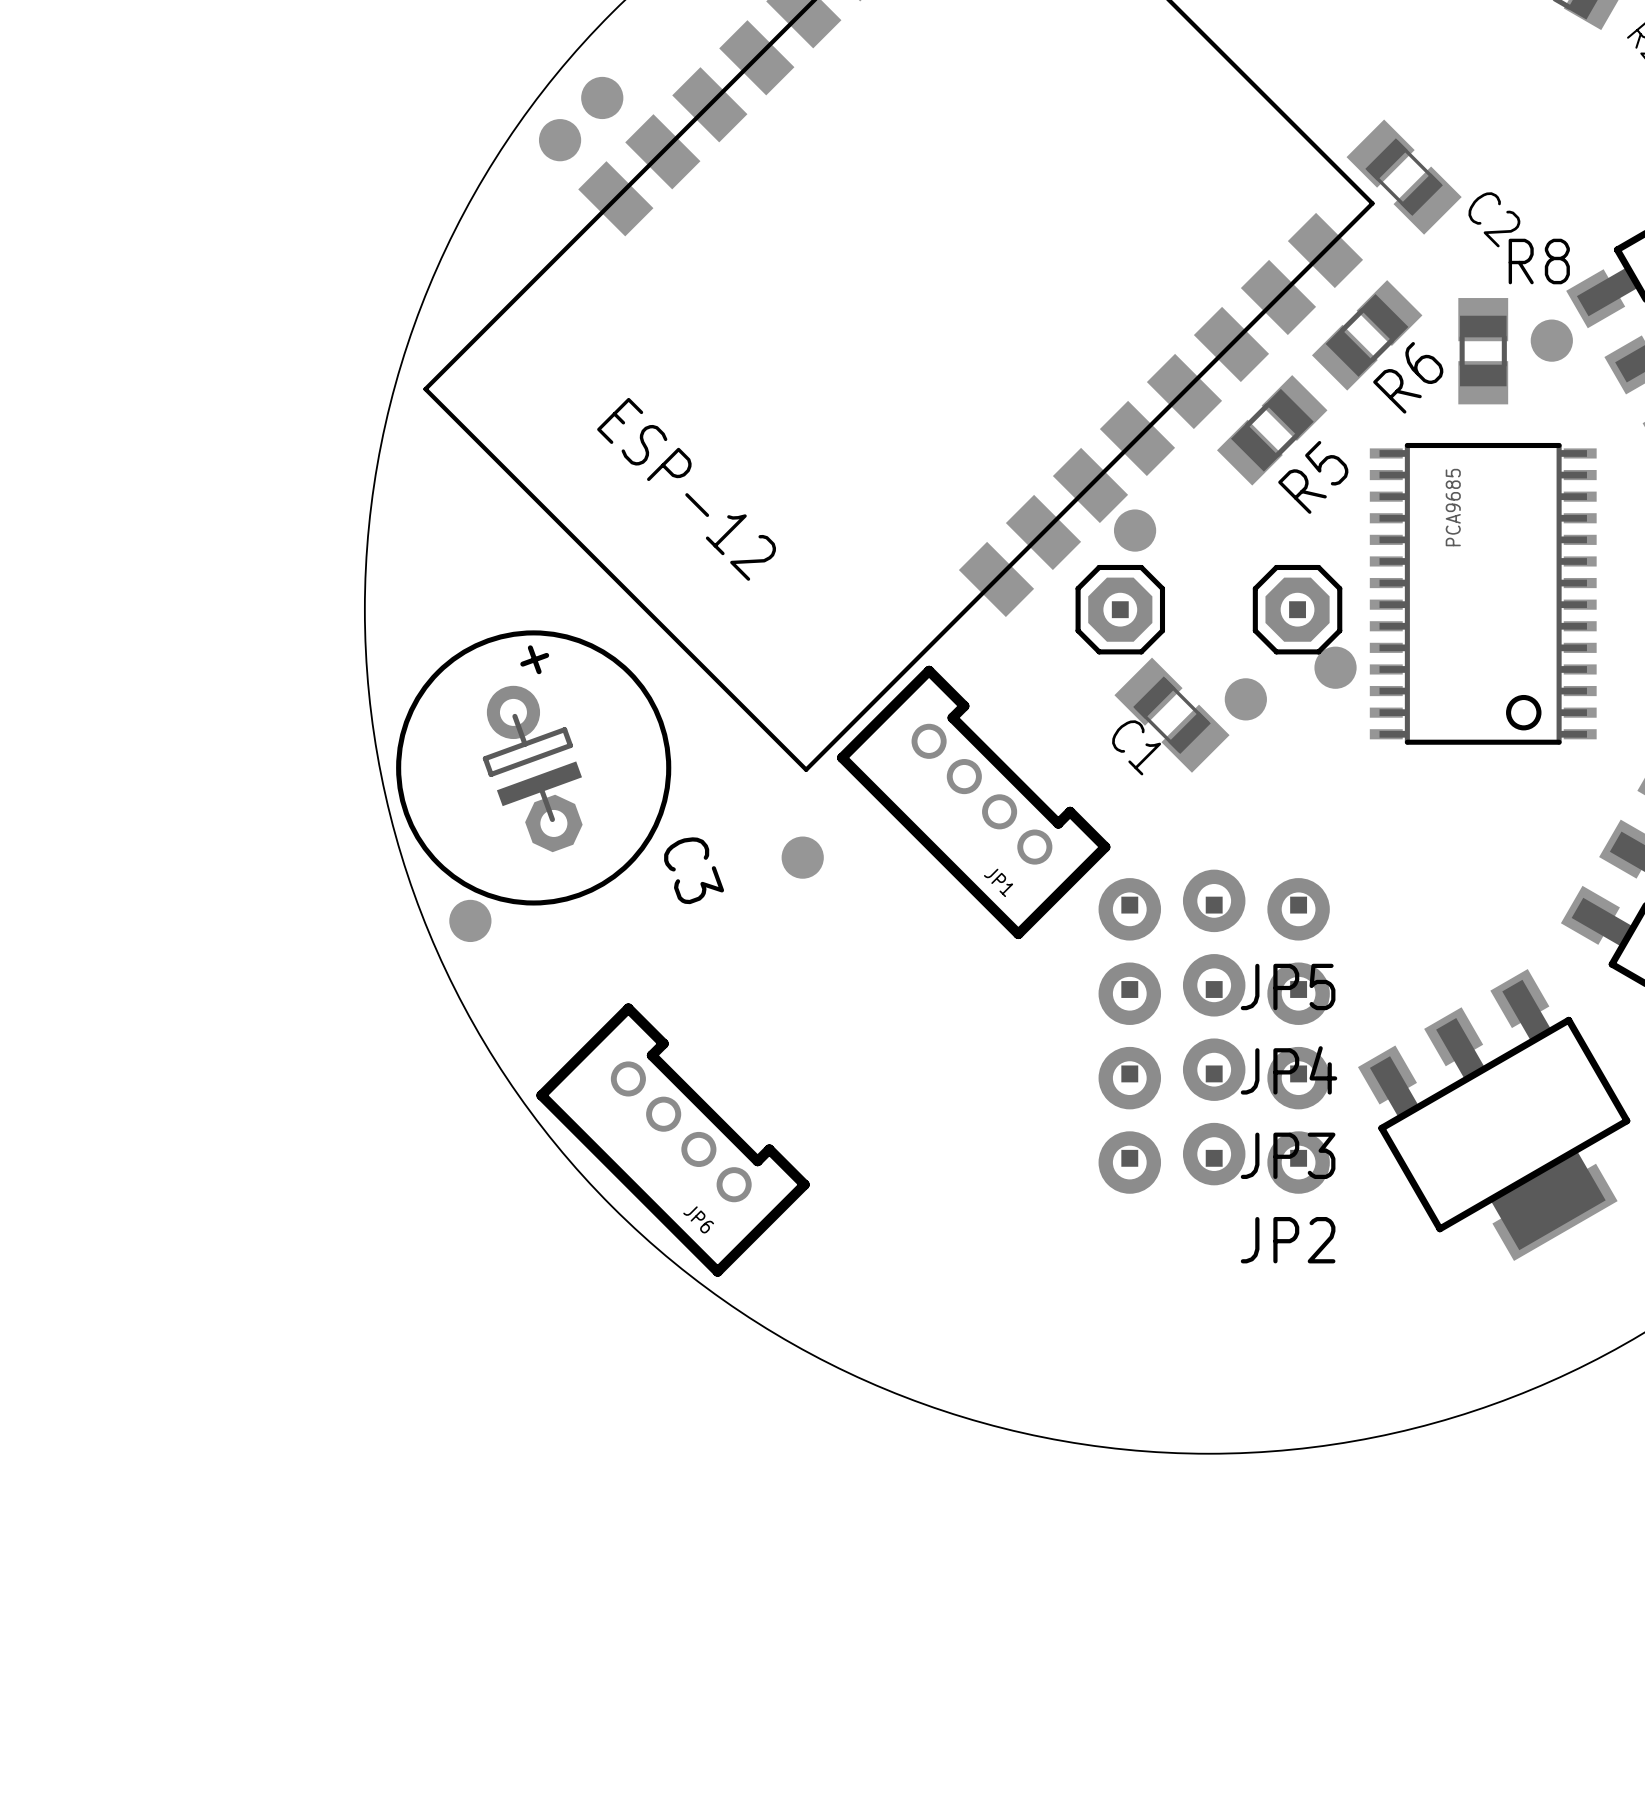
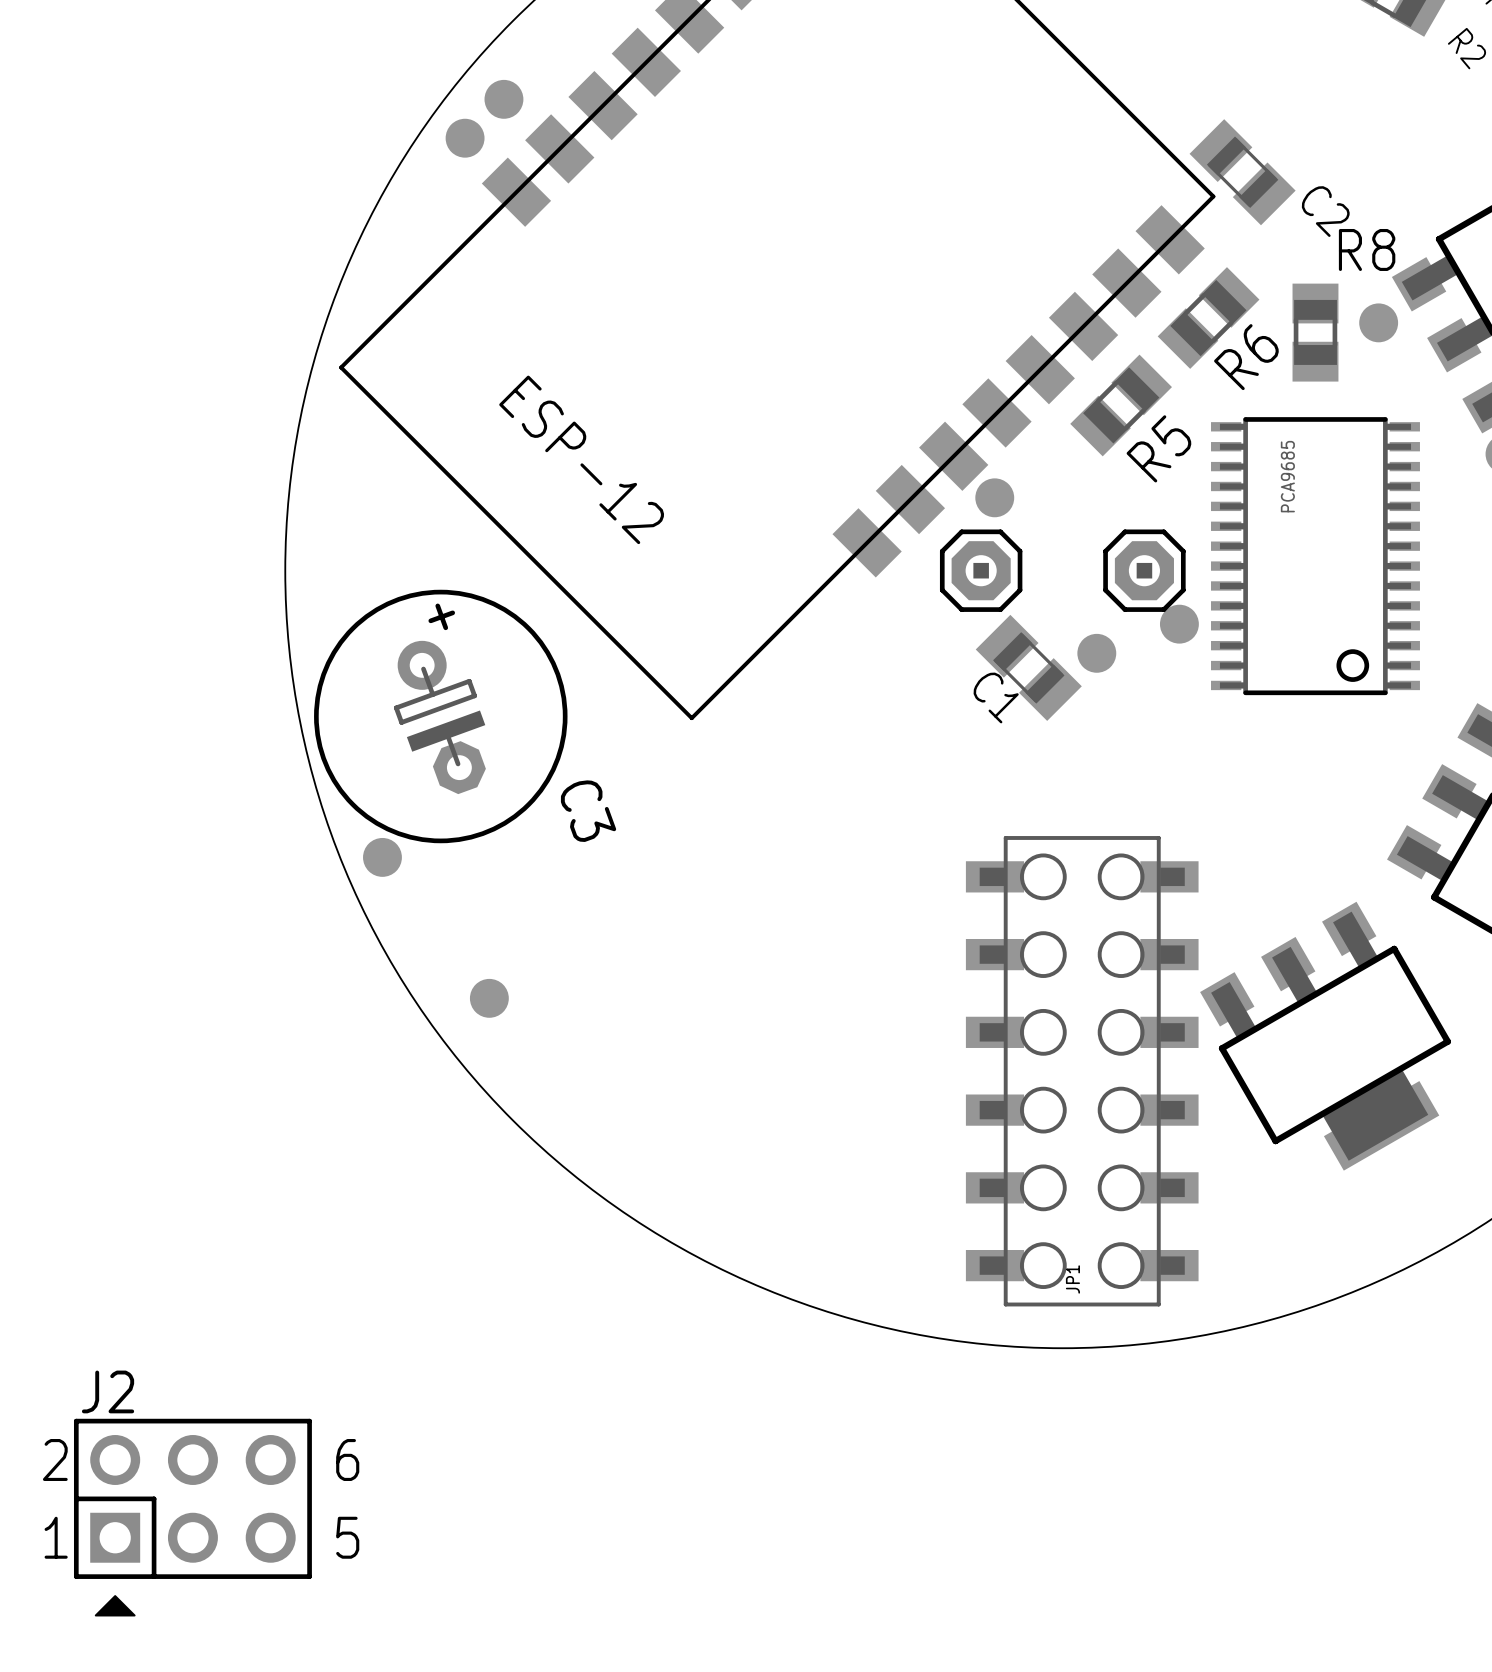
JP1 footprint: [837, 665, 1111, 940] -> [965, 836, 1199, 1307]
part position: (802, 857) -> (489, 998)
JP1 name position: JP1 (998, 882) -> JP1 (1072, 1279)
JP5: (1214, 905) -> none
JP4: (1214, 989) -> none
JP3: (1214, 1073) -> none
JP6: (673, 1140) -> none
JP2: (1214, 1158) -> none
J2: none -> (192, 1517)

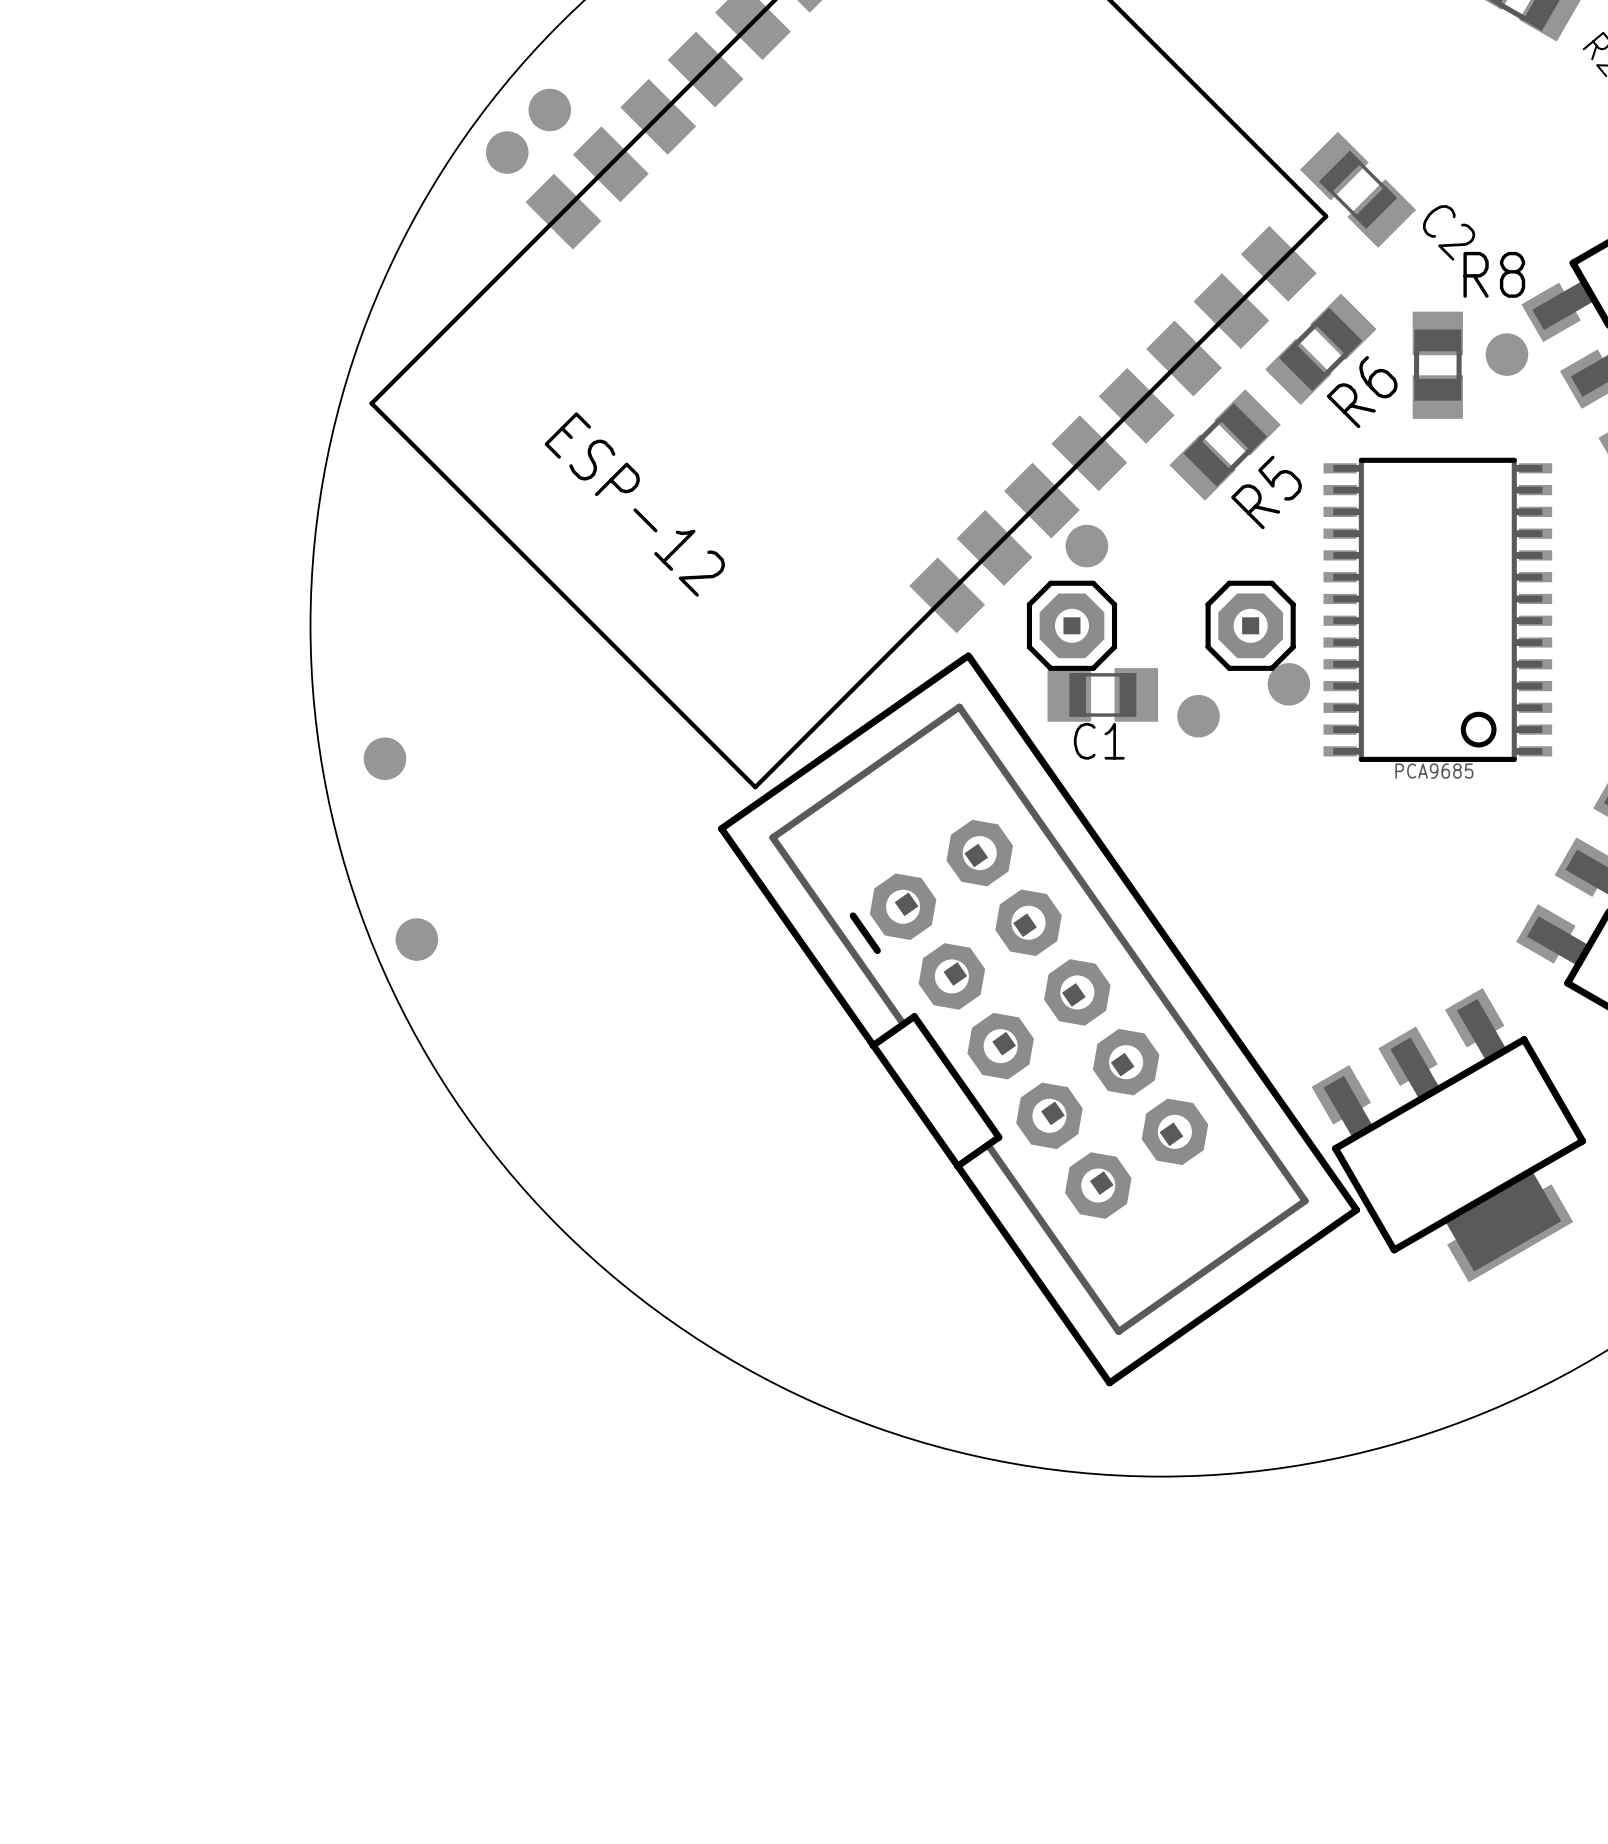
part value rotation: 0° (1287, 476) -> 90° clockwise (1434, 771)
part value position: PCA9685 (1287, 476) -> PCA9685 (1434, 771)
C1 rotation: 0° (1028, 667) -> 45° counterclockwise (1102, 694)
C3: (440, 716) -> none
part: none -> (1039, 1019)
part position: (489, 998) -> (384, 758)
JP1: (1082, 1071) -> none
J2: (192, 1517) -> none

